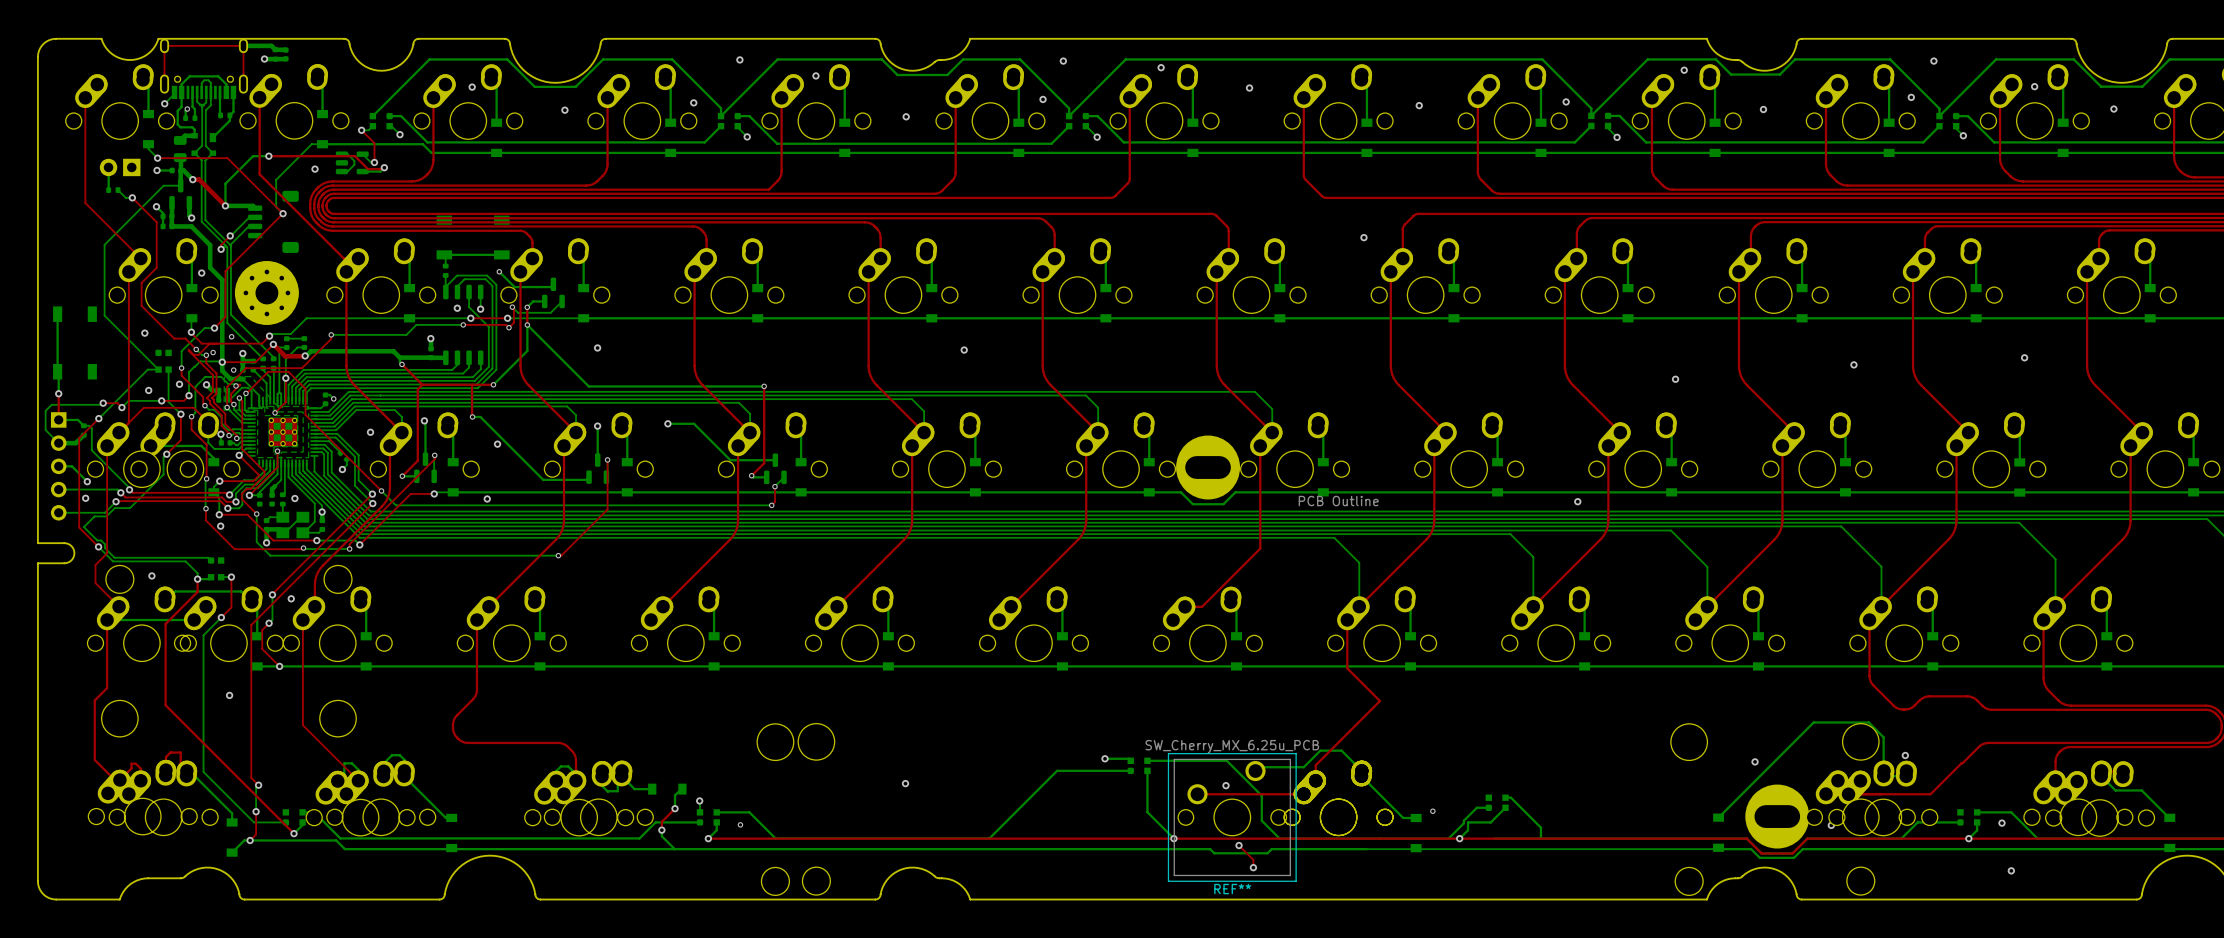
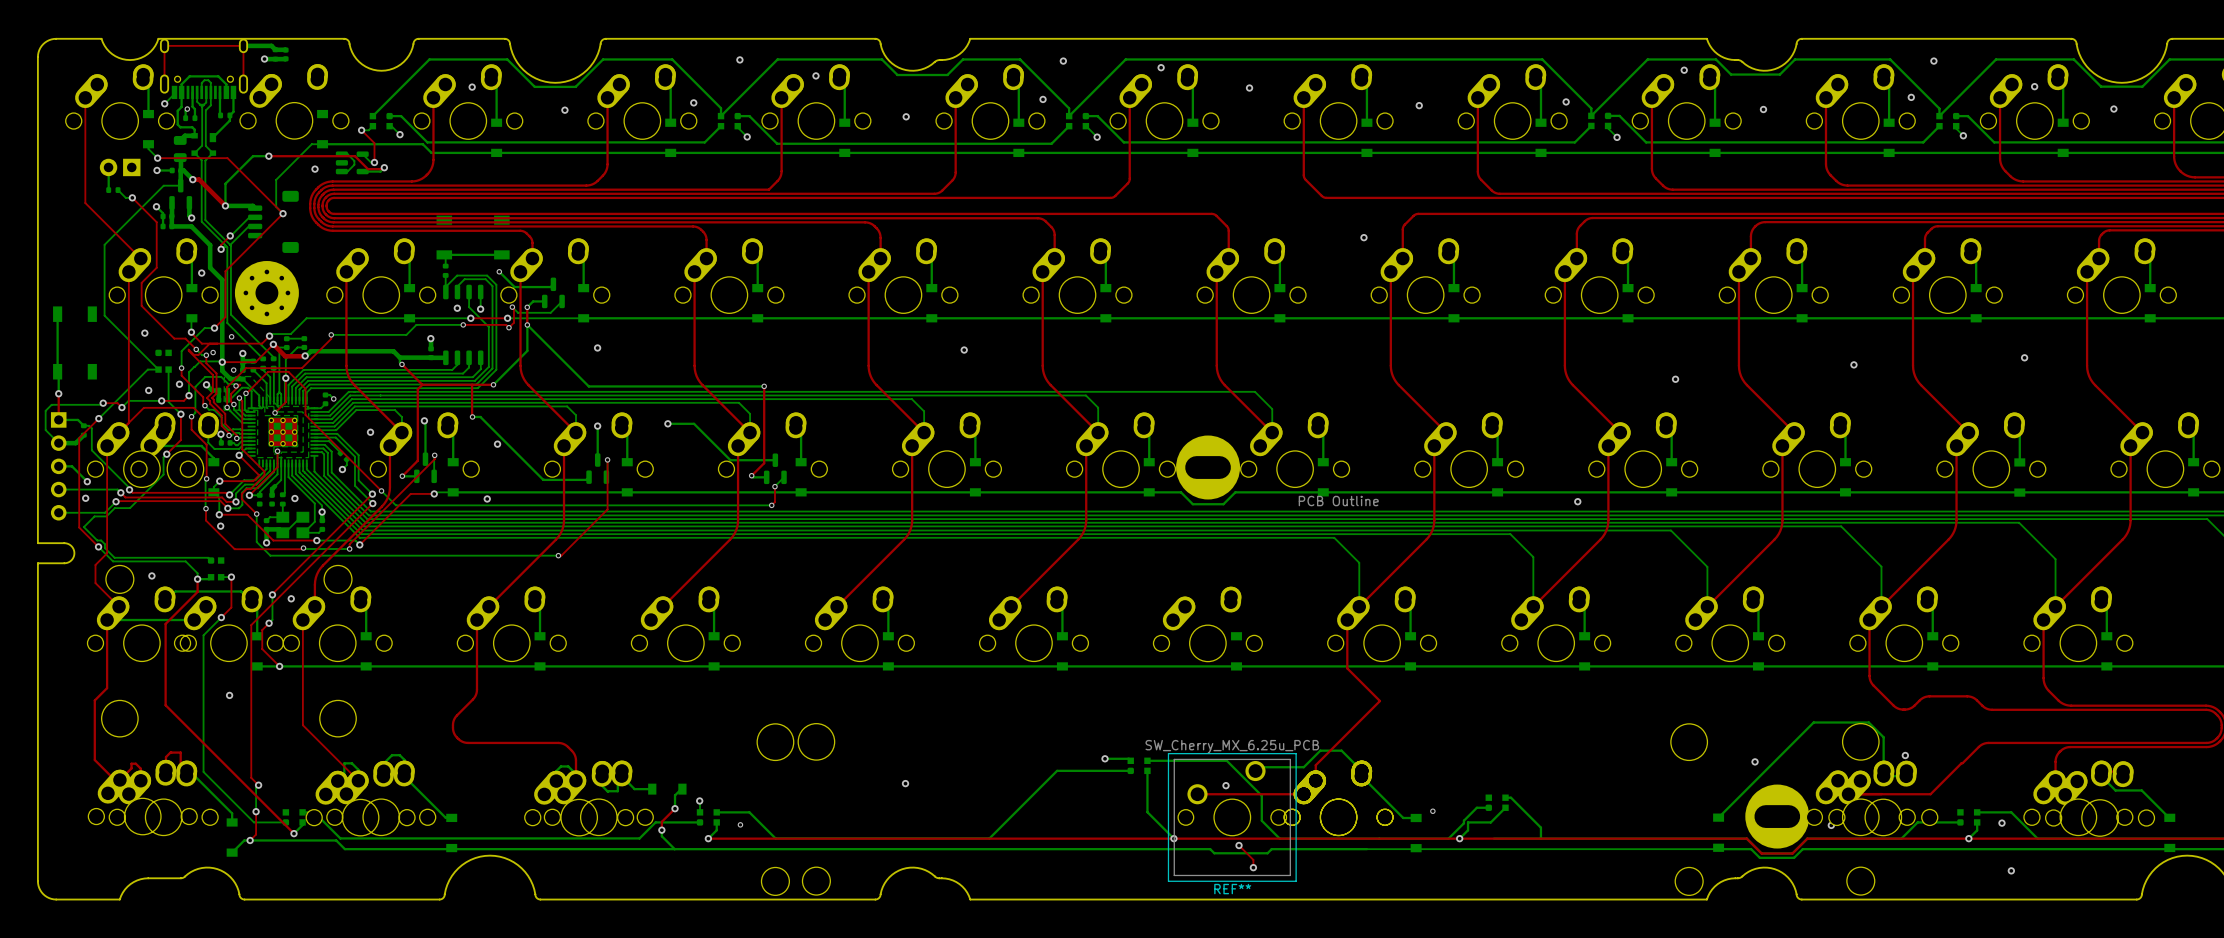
bottom track: (317, 79) (322, 84) (322, 114) -> none
top track: (259, 97) (259, 174) (343, 258) (358, 258) -> none
top track: (1260, 445) (1260, 548) (1202, 606) (1185, 606) (1173, 620) -> none
bottom track: (1230, 602) (1236, 608) (1236, 636) -> none

